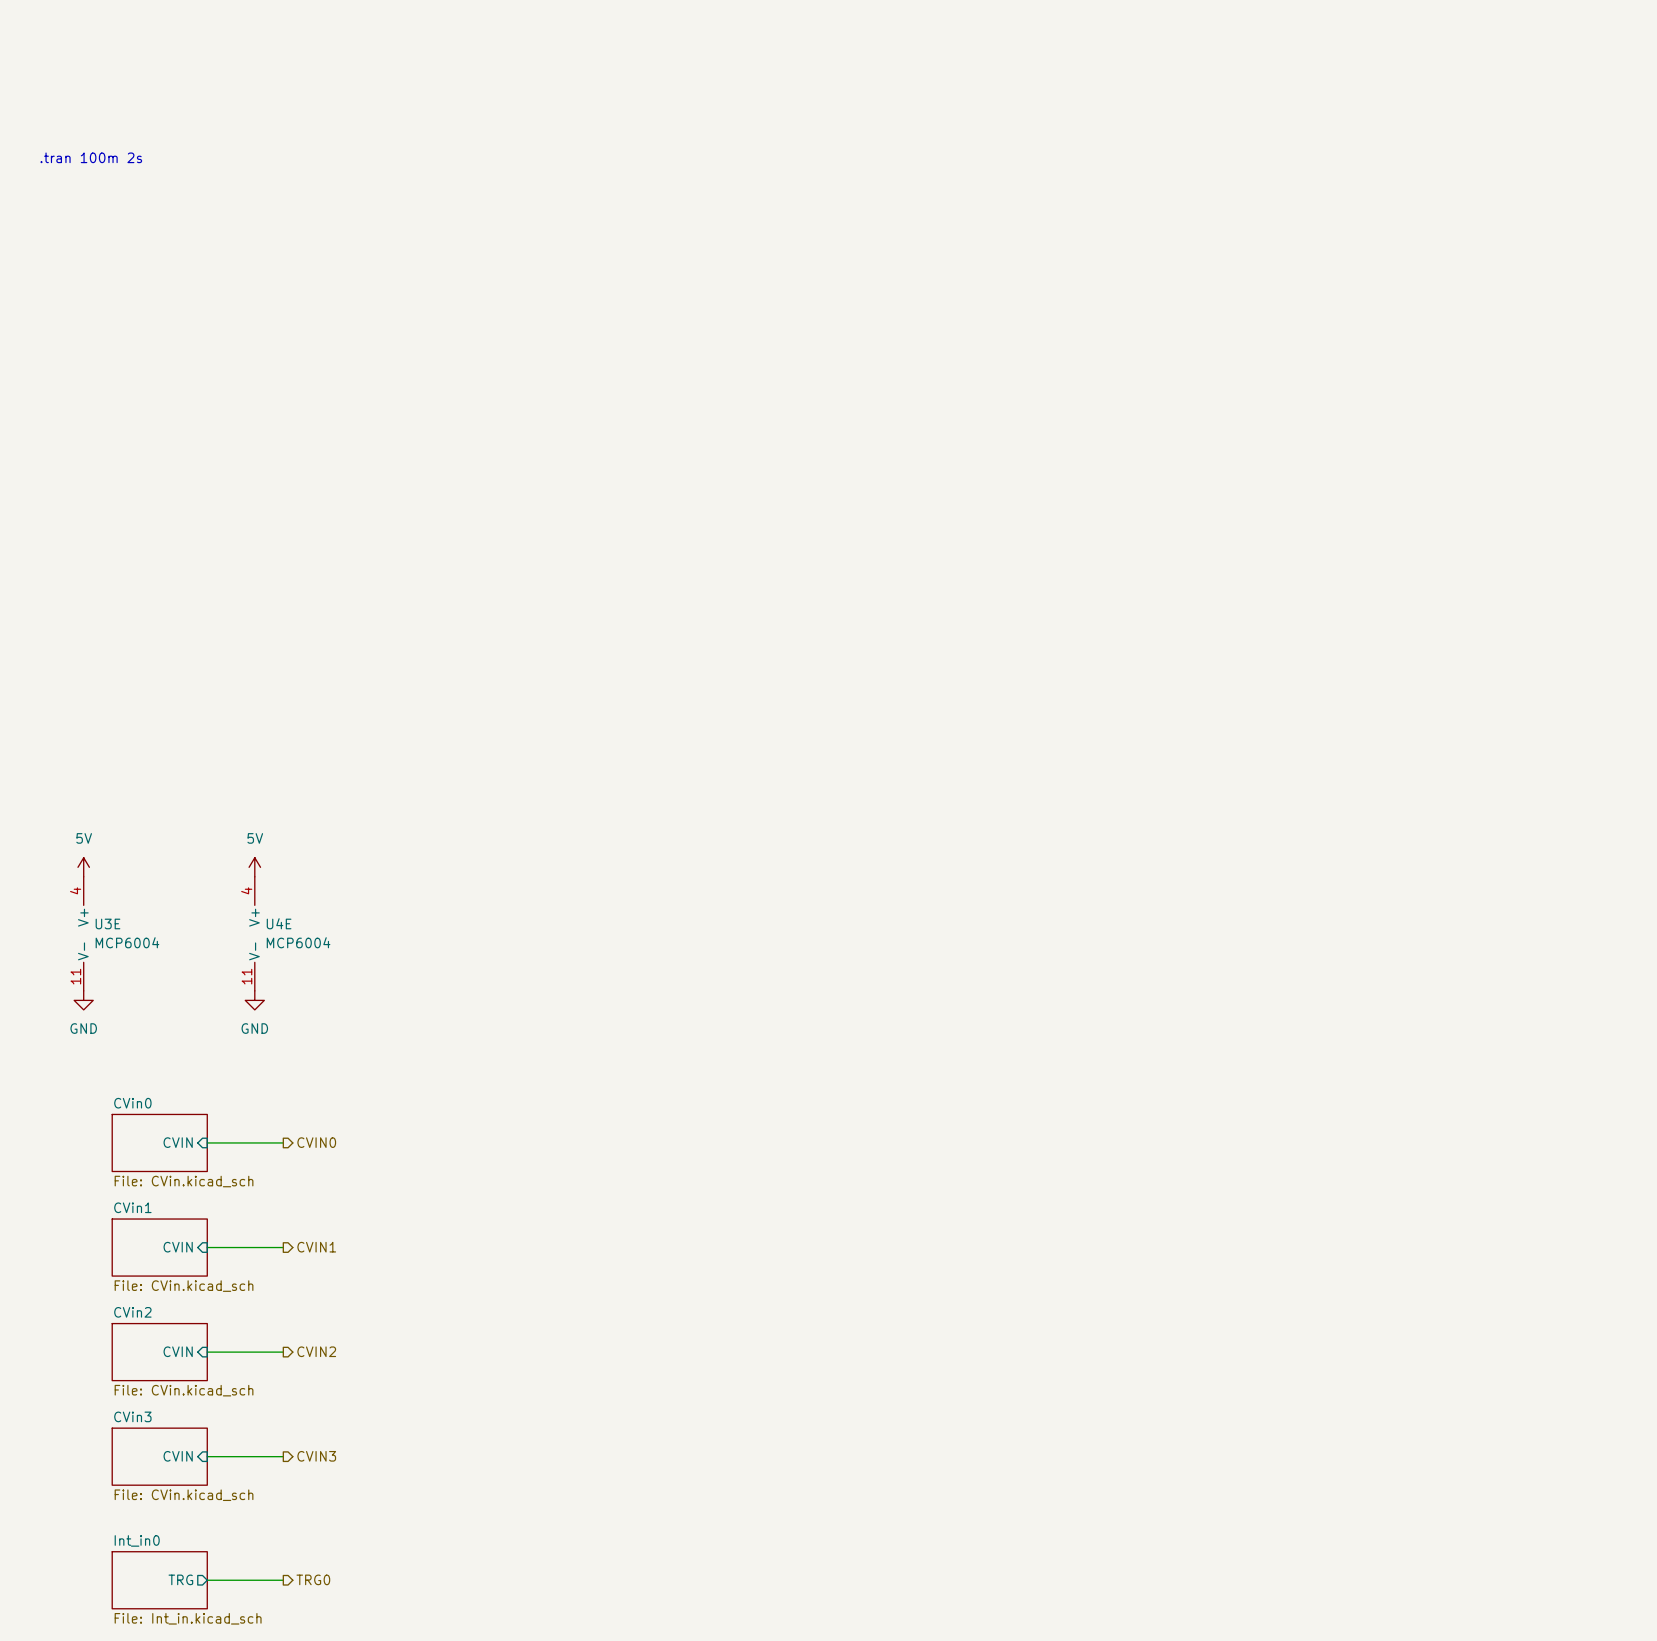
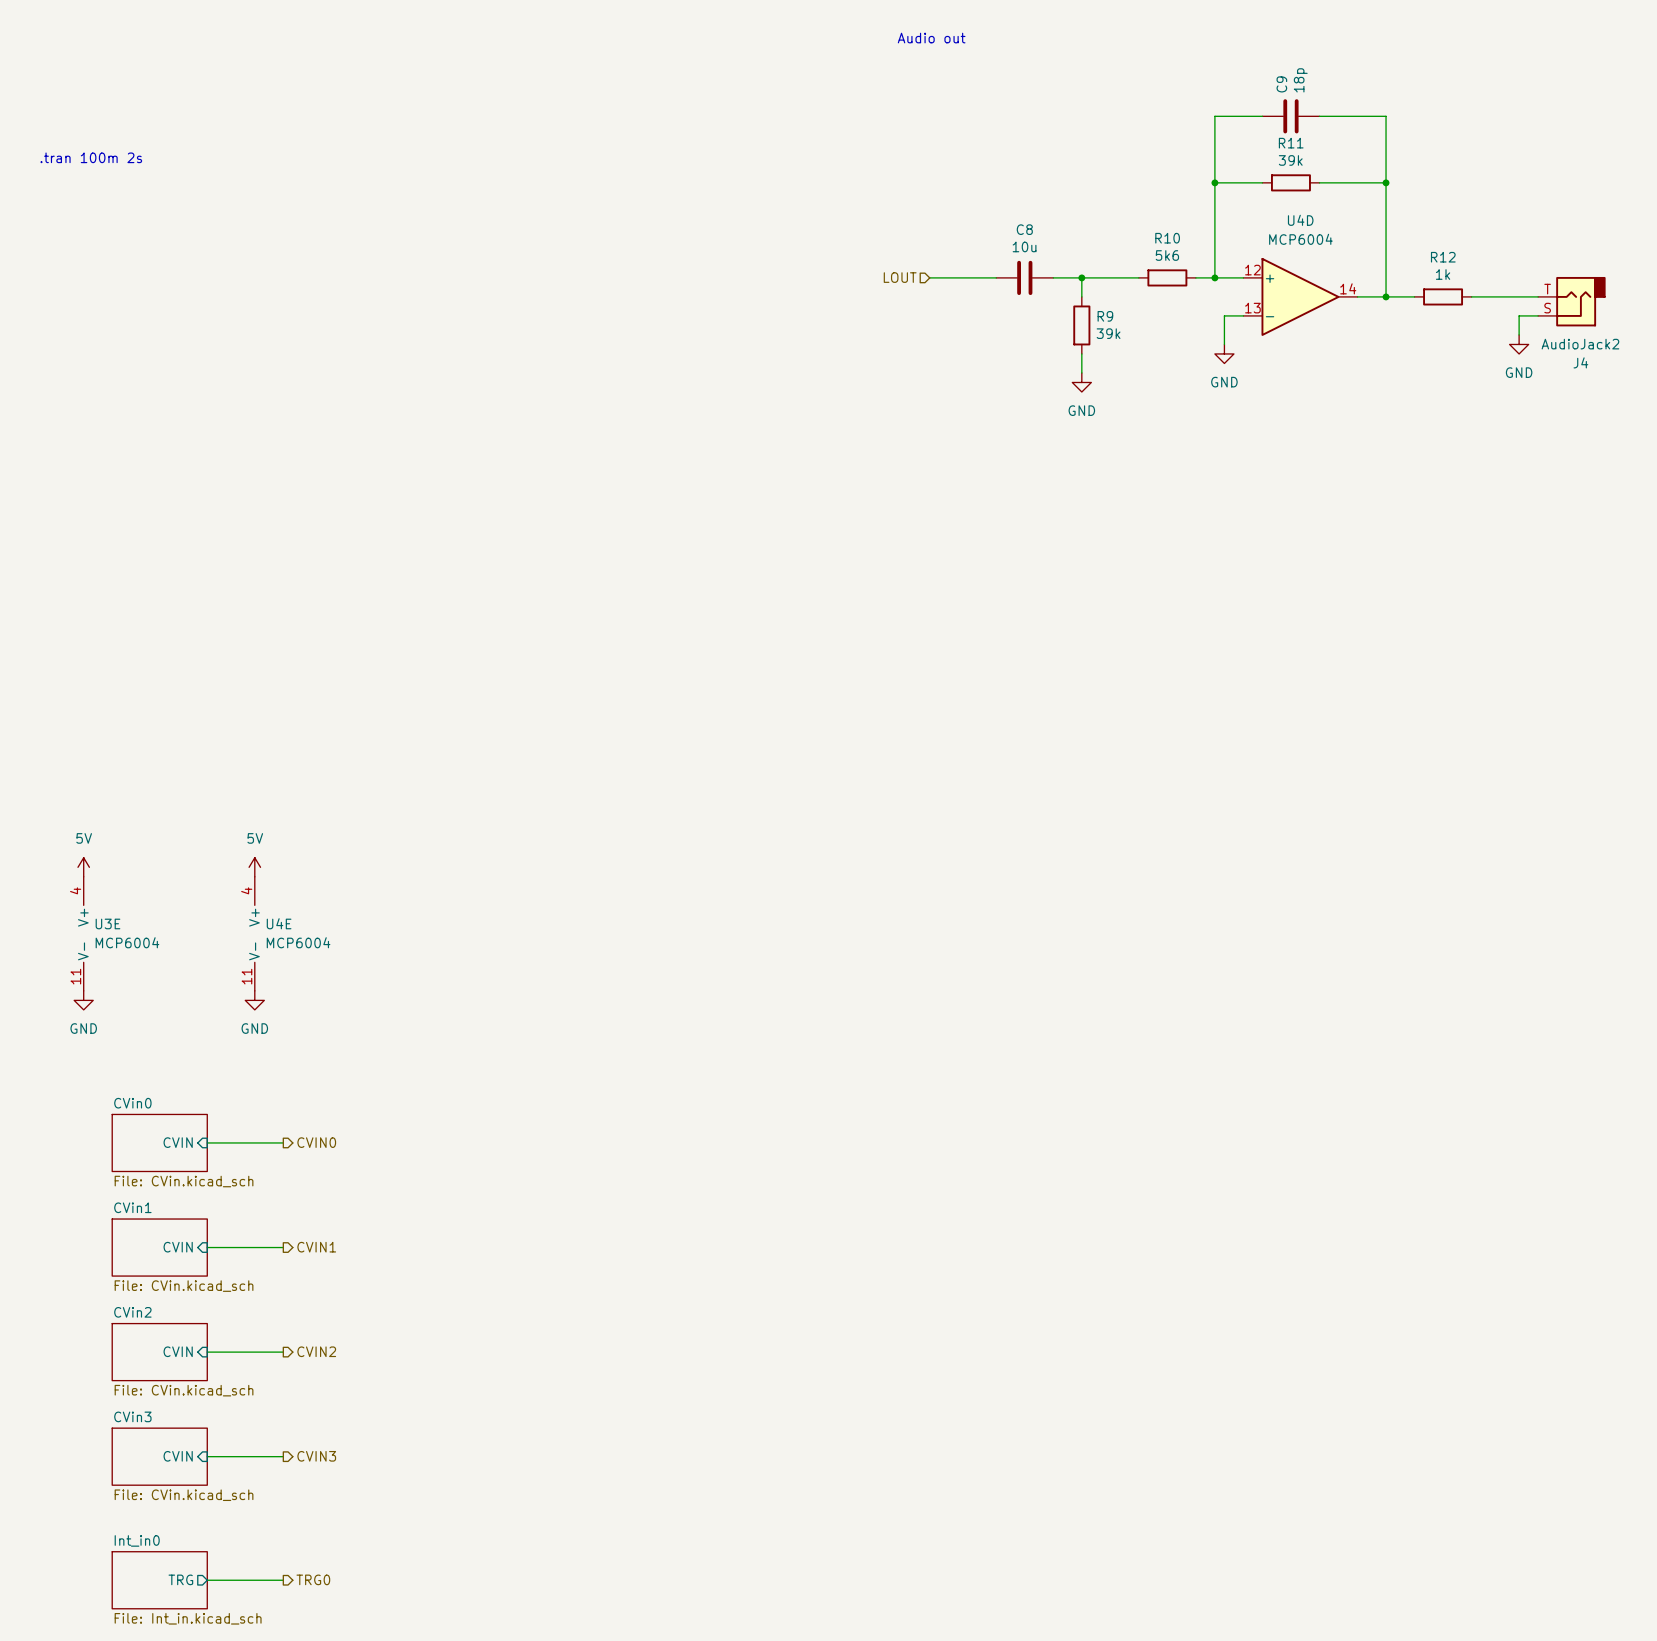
text: none -> Audio out (931, 38)
wire: none -> (1262, 116) (1214, 116) (1214, 277)
C9: none -> 18p (1290, 116)
wire: none -> (1319, 116) (1386, 116) (1386, 296)
wire: none -> (1214, 182) (1262, 182)
junction: none -> (1214, 182)
R11: none -> 39k (1290, 182)
wire: none -> (1319, 182) (1386, 182)
junction: none -> (1386, 182)
hierarchical label: none -> LOUT (900, 277)
wire: none -> (929, 277) (996, 277)
C8: none -> 10u (1024, 277)
wire: none -> (1053, 277) (1138, 277)
wire: none -> (1081, 277) (1081, 296)
junction: none -> (1081, 277)
R10: none -> 5k6 (1167, 277)
wire: none -> (1195, 277) (1243, 277)
junction: none -> (1214, 277)
U4D: none -> MCP6004 (1300, 296)
wire: none -> (1357, 296) (1414, 296)
junction: none -> (1386, 296)
R12: none -> 1k (1443, 296)
wire: none -> (1471, 296) (1538, 296)
J4: none -> AudioJack2 (1571, 301)
wire: none -> (1243, 315) (1224, 315) (1224, 344)
wire: none -> (1538, 315) (1519, 315) (1519, 334)
R9: none -> 39k (1081, 325)
power symbol: none -> GND (1519, 344)
wire: none -> (1081, 353) (1081, 372)
power symbol: none -> GND (1224, 353)
power symbol: none -> GND (1081, 382)

